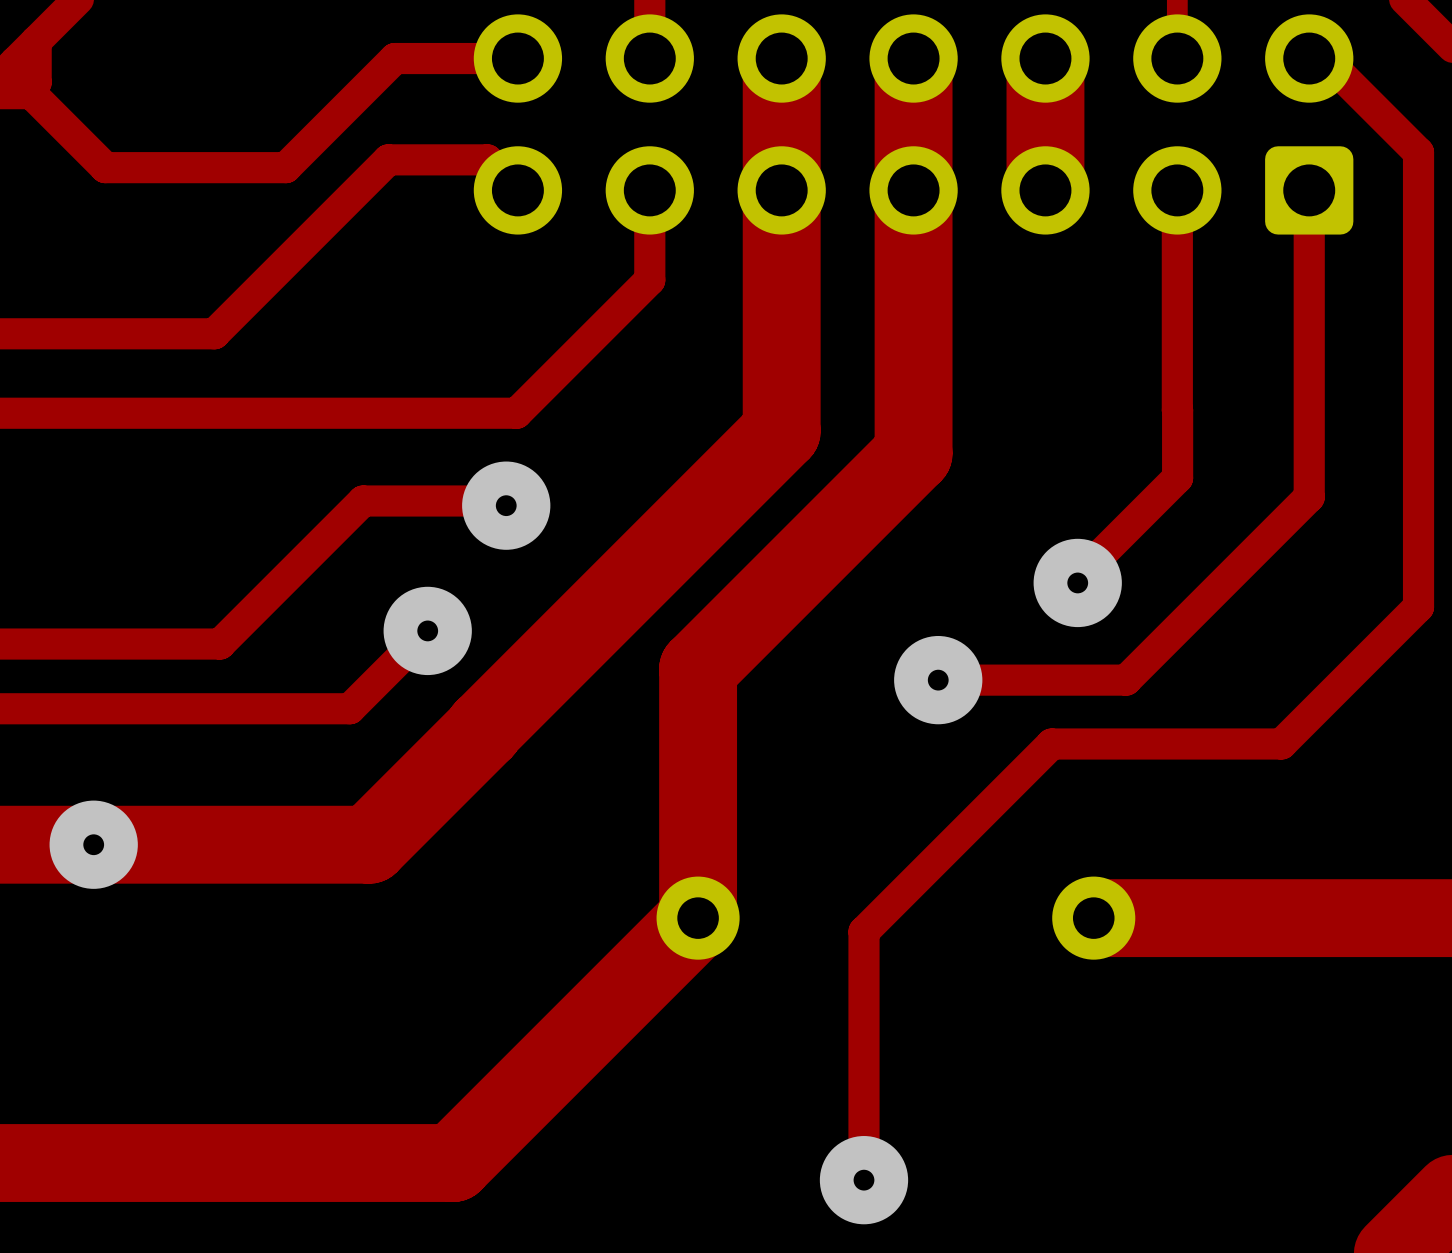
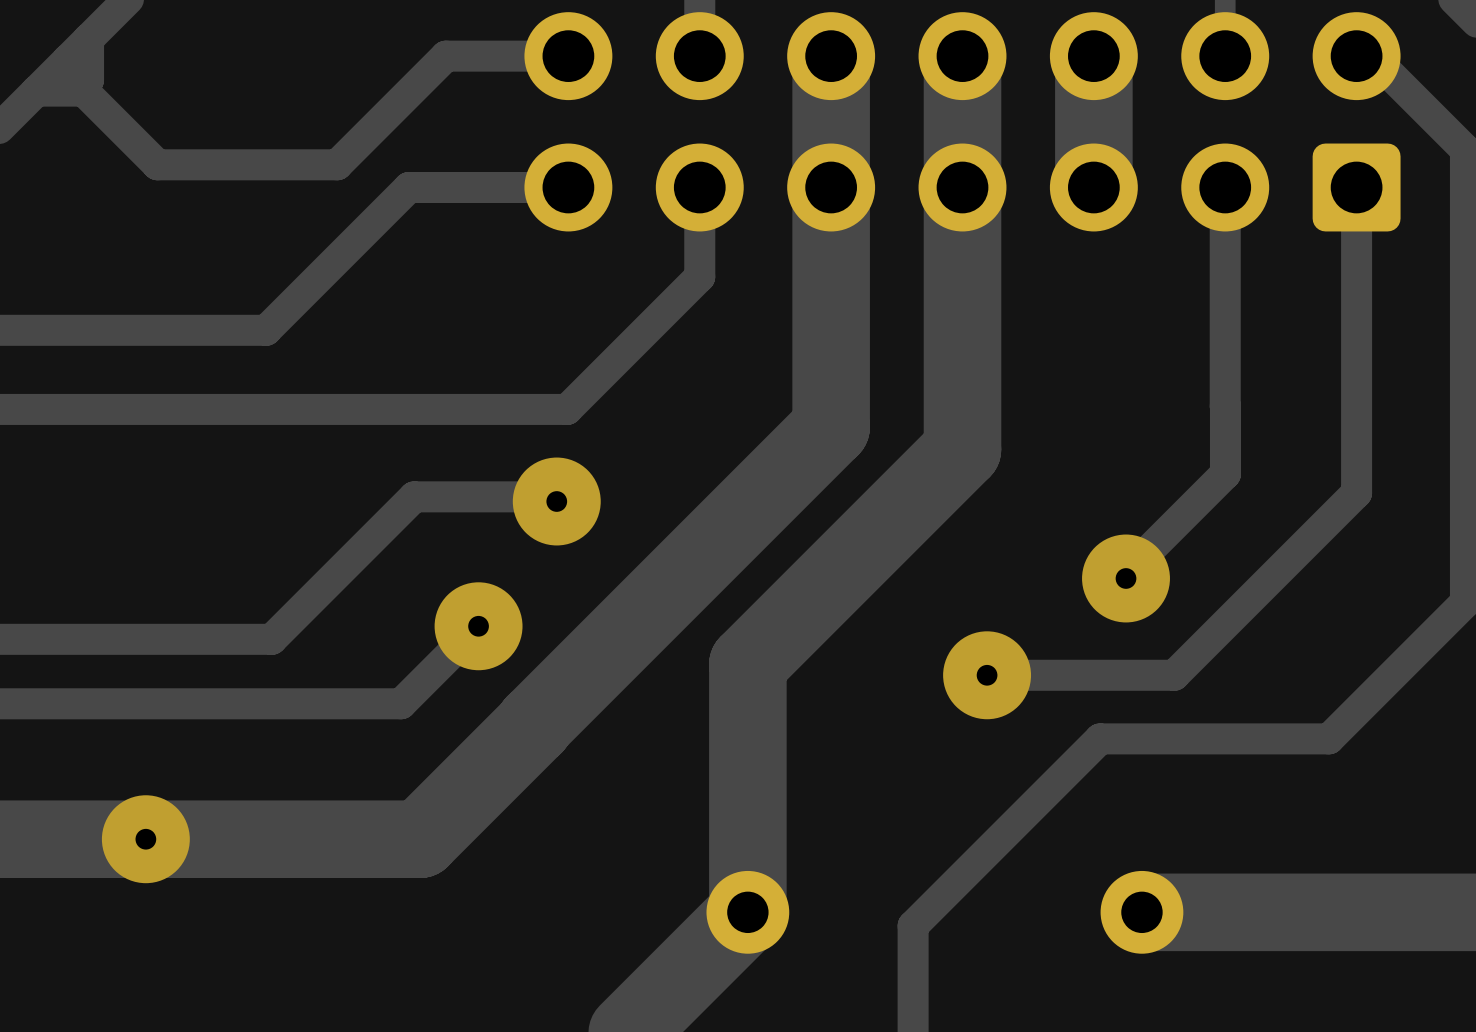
track: (357, 190) (388, 159) (487, 159) (517, 190) -> (408, 187) (568, 187)

